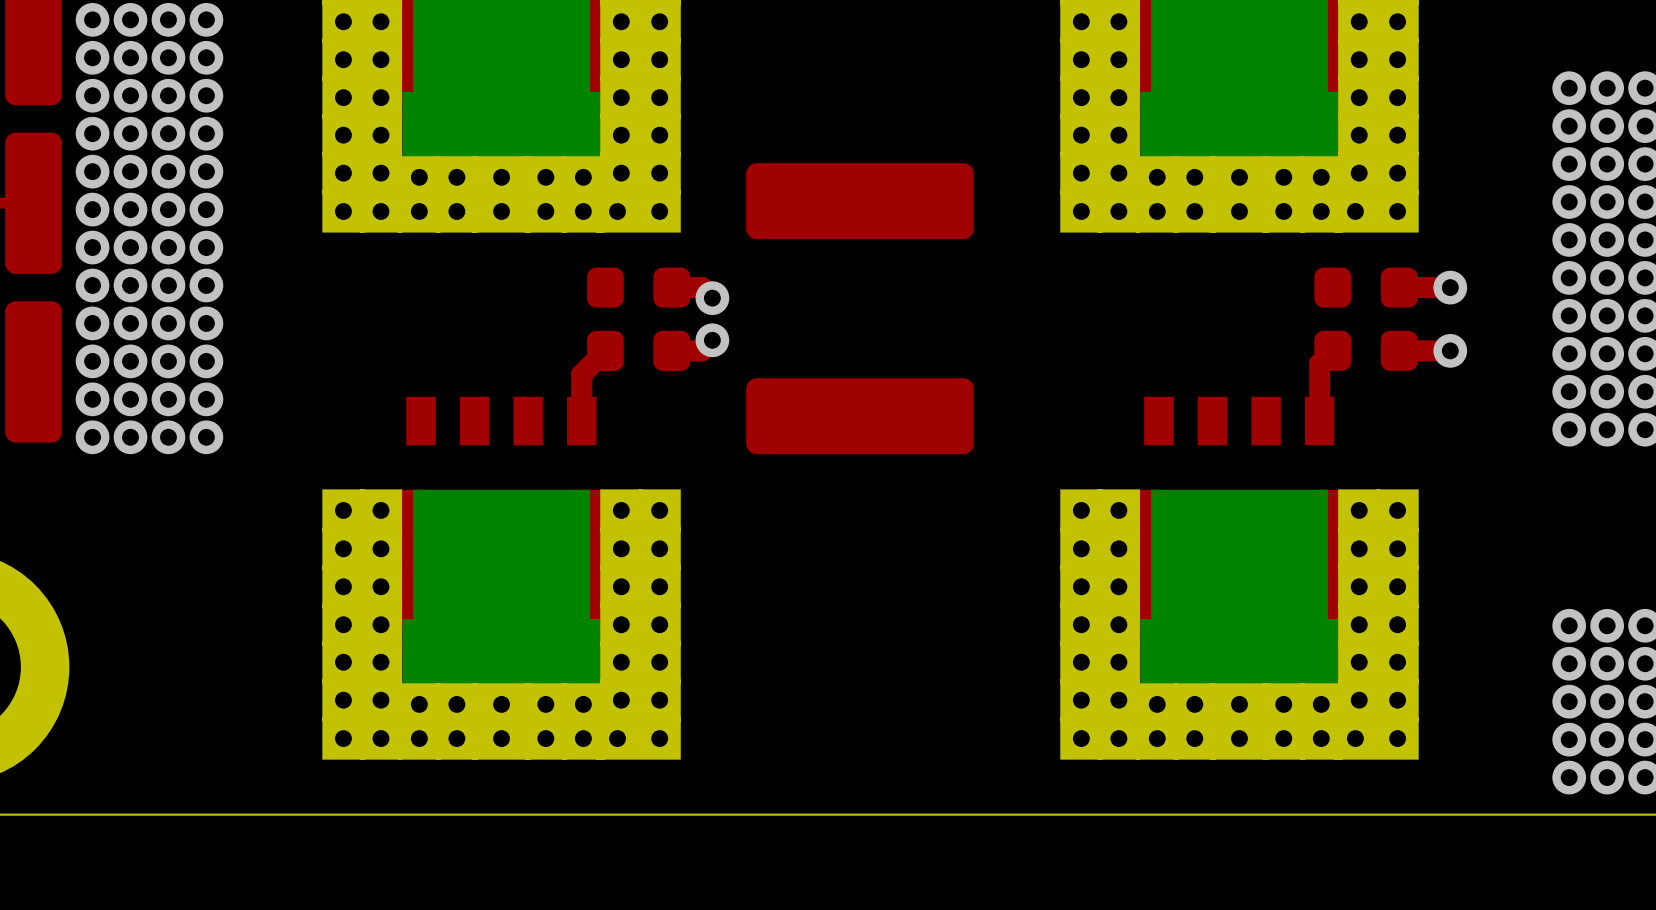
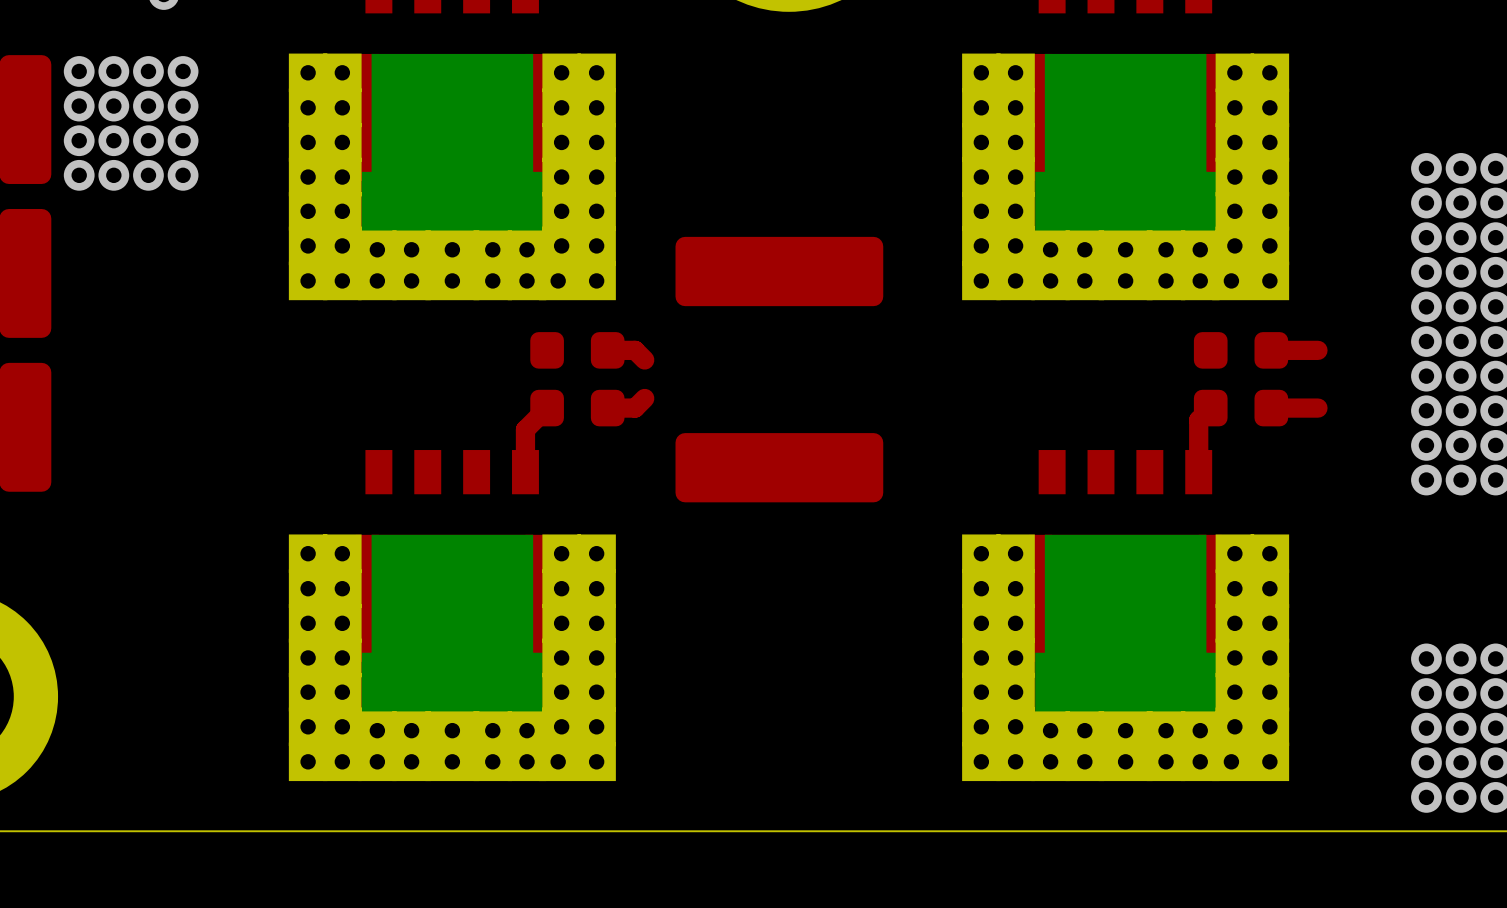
via: (92, 133) -> none
via: (130, 133) -> none
via: (168, 133) -> none
via: (206, 133) -> none
via: (92, 171) -> none
via: (130, 171) -> none
via: (168, 171) -> none
via: (206, 171) -> none
via: (92, 209) -> none
via: (130, 209) -> none
via: (168, 209) -> none
via: (206, 209) -> none
via: (92, 247) -> none
via: (130, 247) -> none
via: (168, 247) -> none
via: (206, 247) -> none
via: (92, 285) -> none
via: (130, 285) -> none
via: (168, 285) -> none
via: (206, 285) -> none
via: (1450, 287) -> none
via: (712, 298) -> none
via: (92, 323) -> none
via: (130, 323) -> none
via: (168, 323) -> none
via: (206, 323) -> none
via: (712, 340) -> none
via: (1450, 350) -> none
via: (92, 361) -> none
via: (130, 361) -> none
via: (168, 361) -> none
via: (206, 361) -> none
via: (92, 399) -> none
via: (130, 399) -> none
via: (168, 399) -> none
via: (206, 399) -> none
via: (92, 437) -> none
via: (130, 437) -> none
via: (168, 437) -> none
via: (206, 437) -> none

